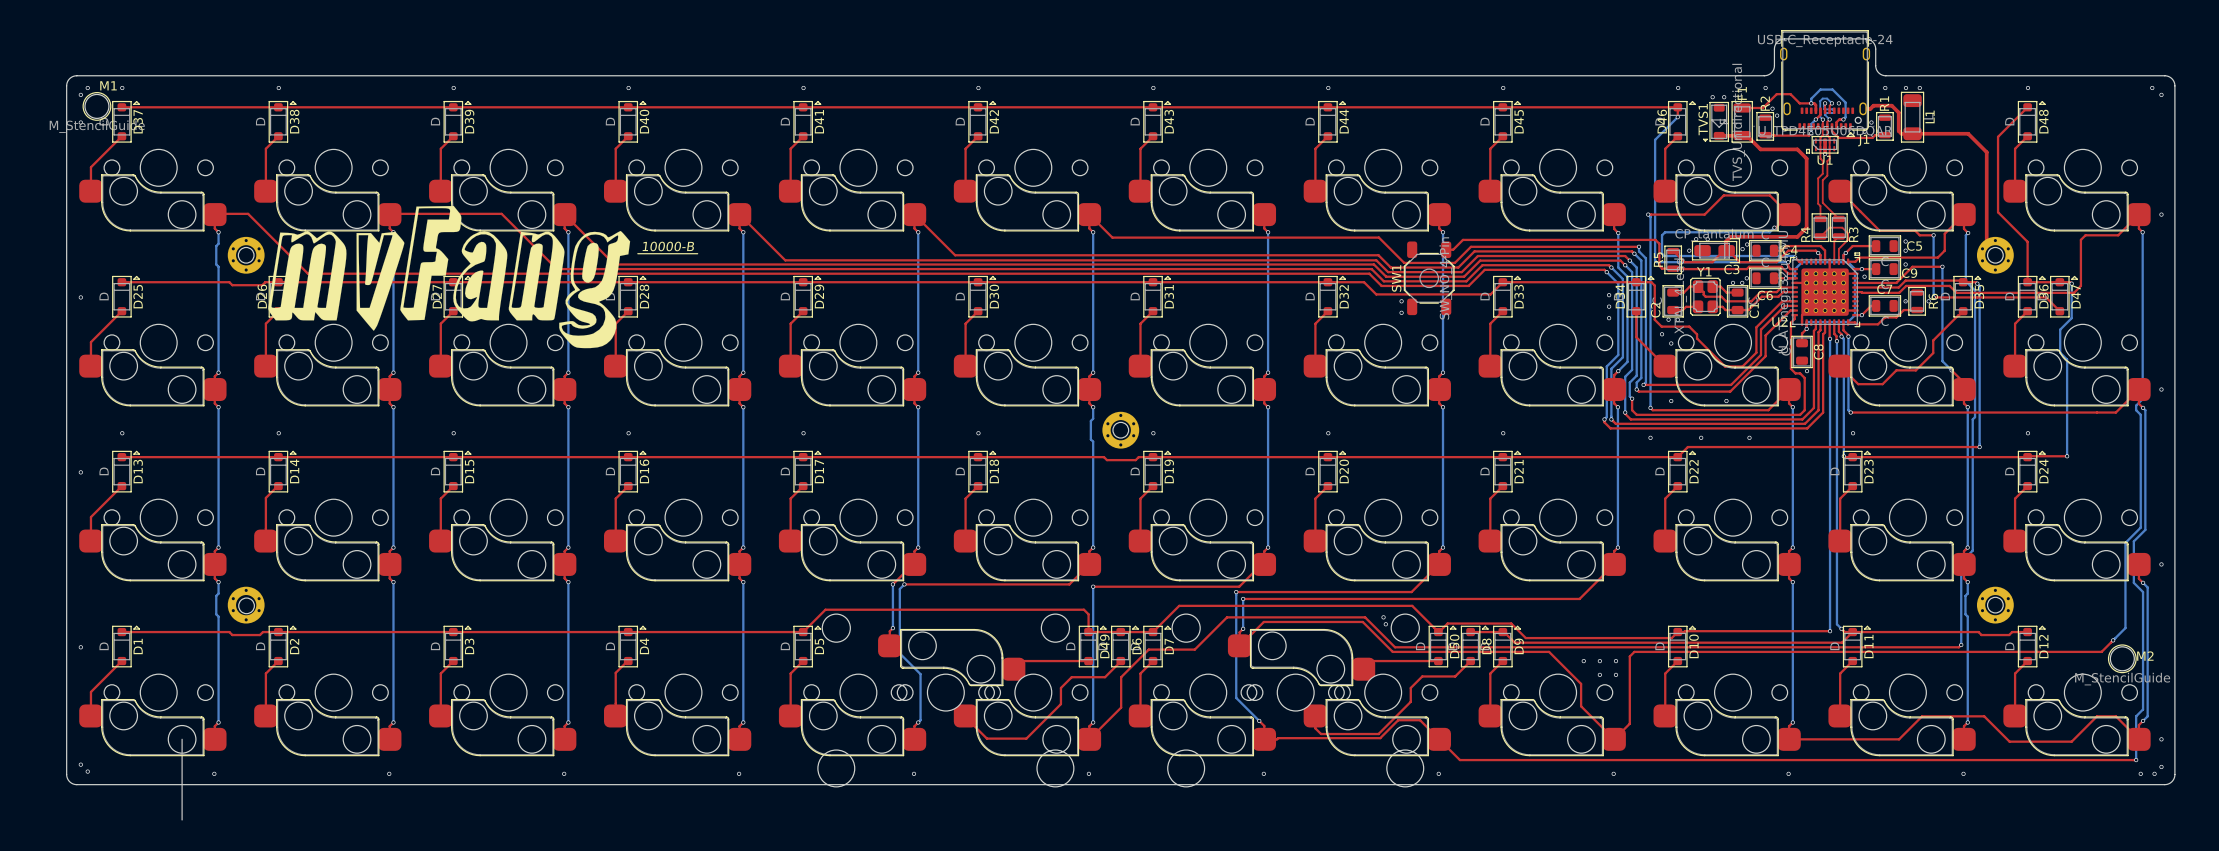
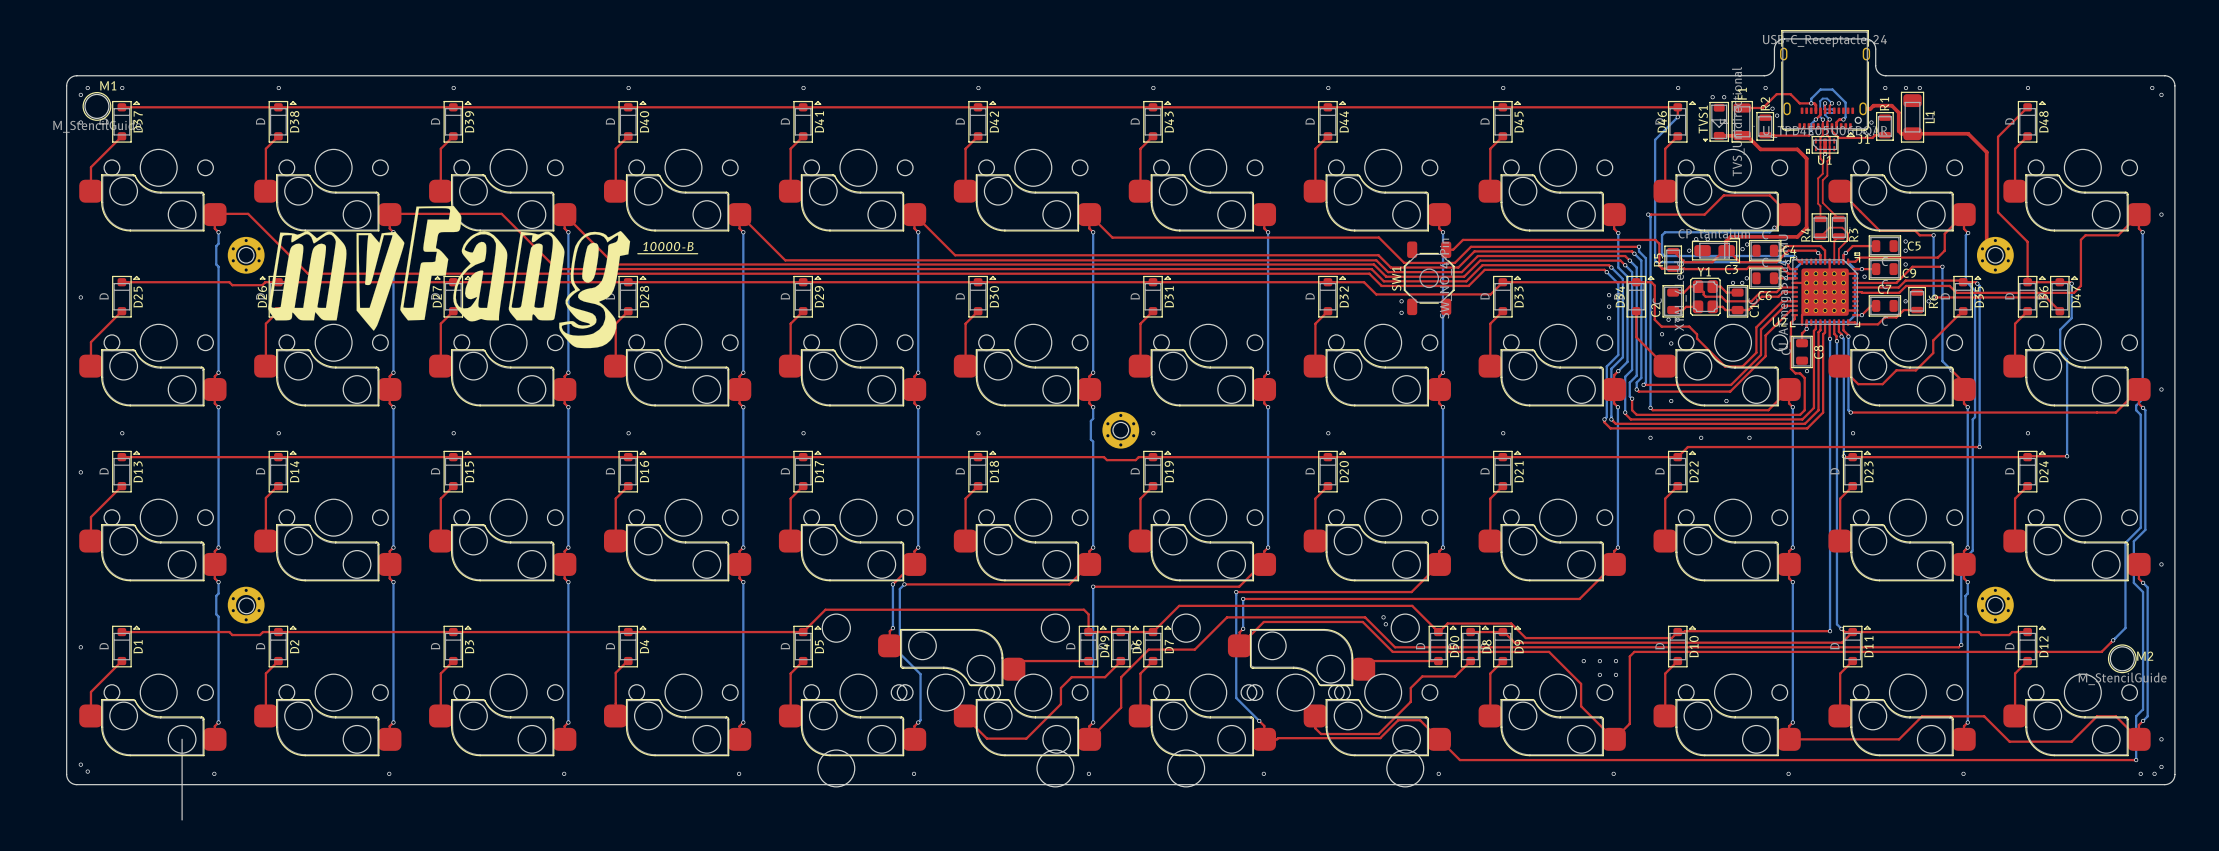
line: none -> (262, 276) (260, 279) (264, 279) (262, 276)
line: none -> (437, 276) (439, 279) (435, 279) (437, 276)

